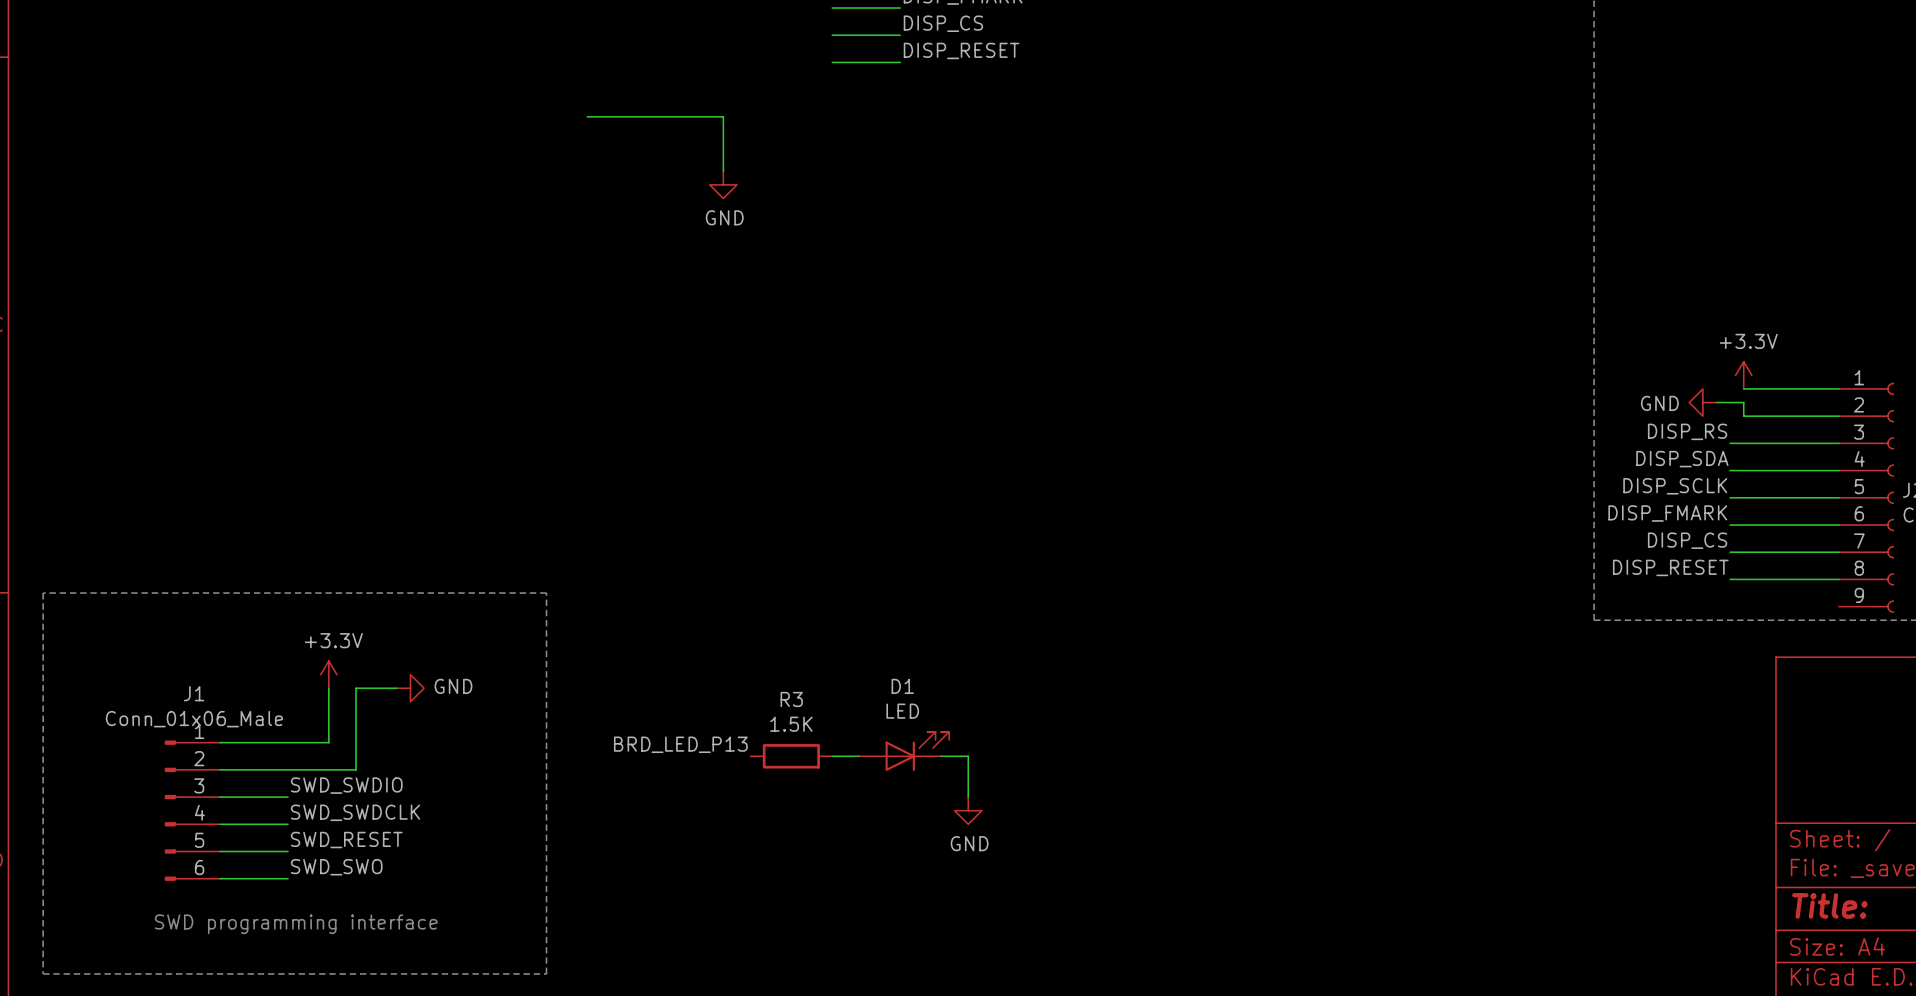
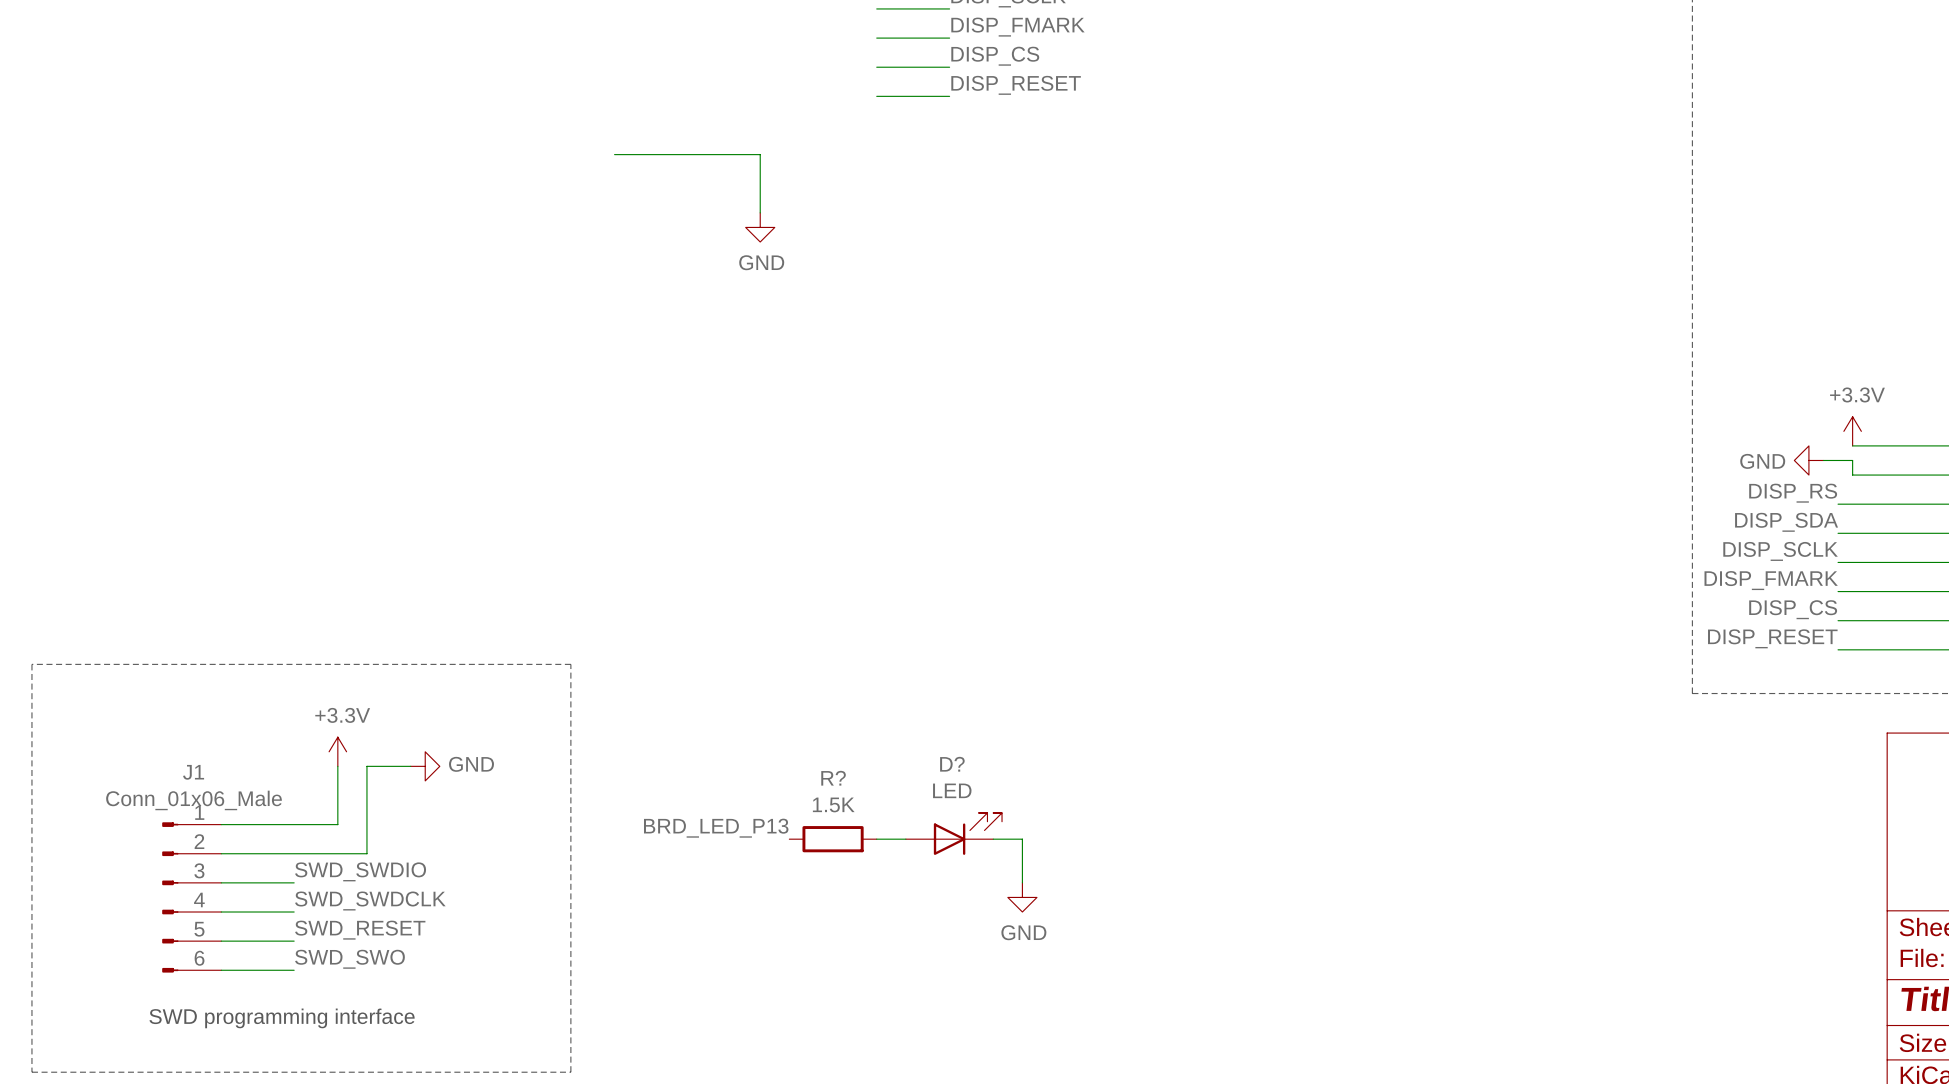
D1 name: D1 (902, 686) -> D? (952, 764)
R3 name: R3 (791, 699) -> R? (833, 778)

